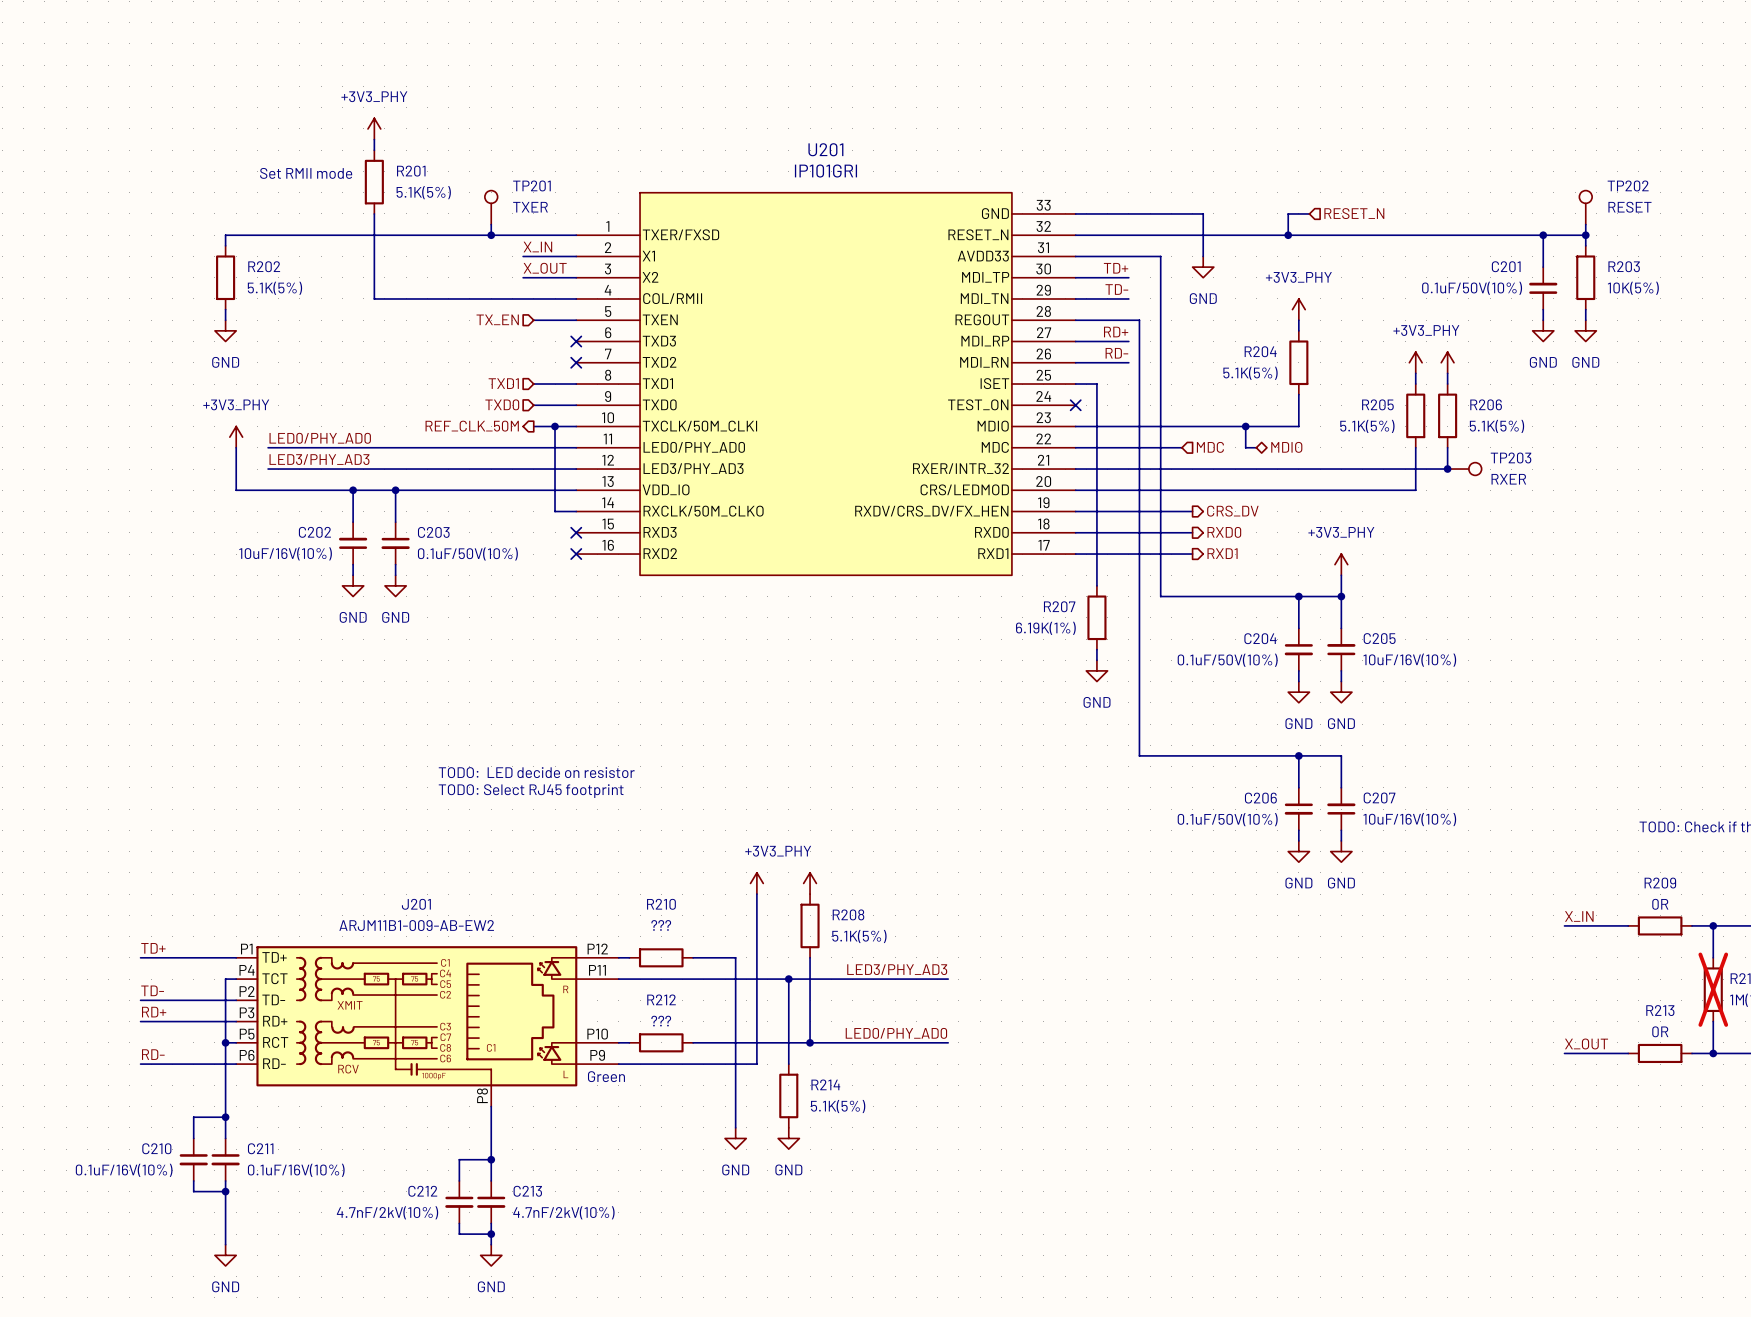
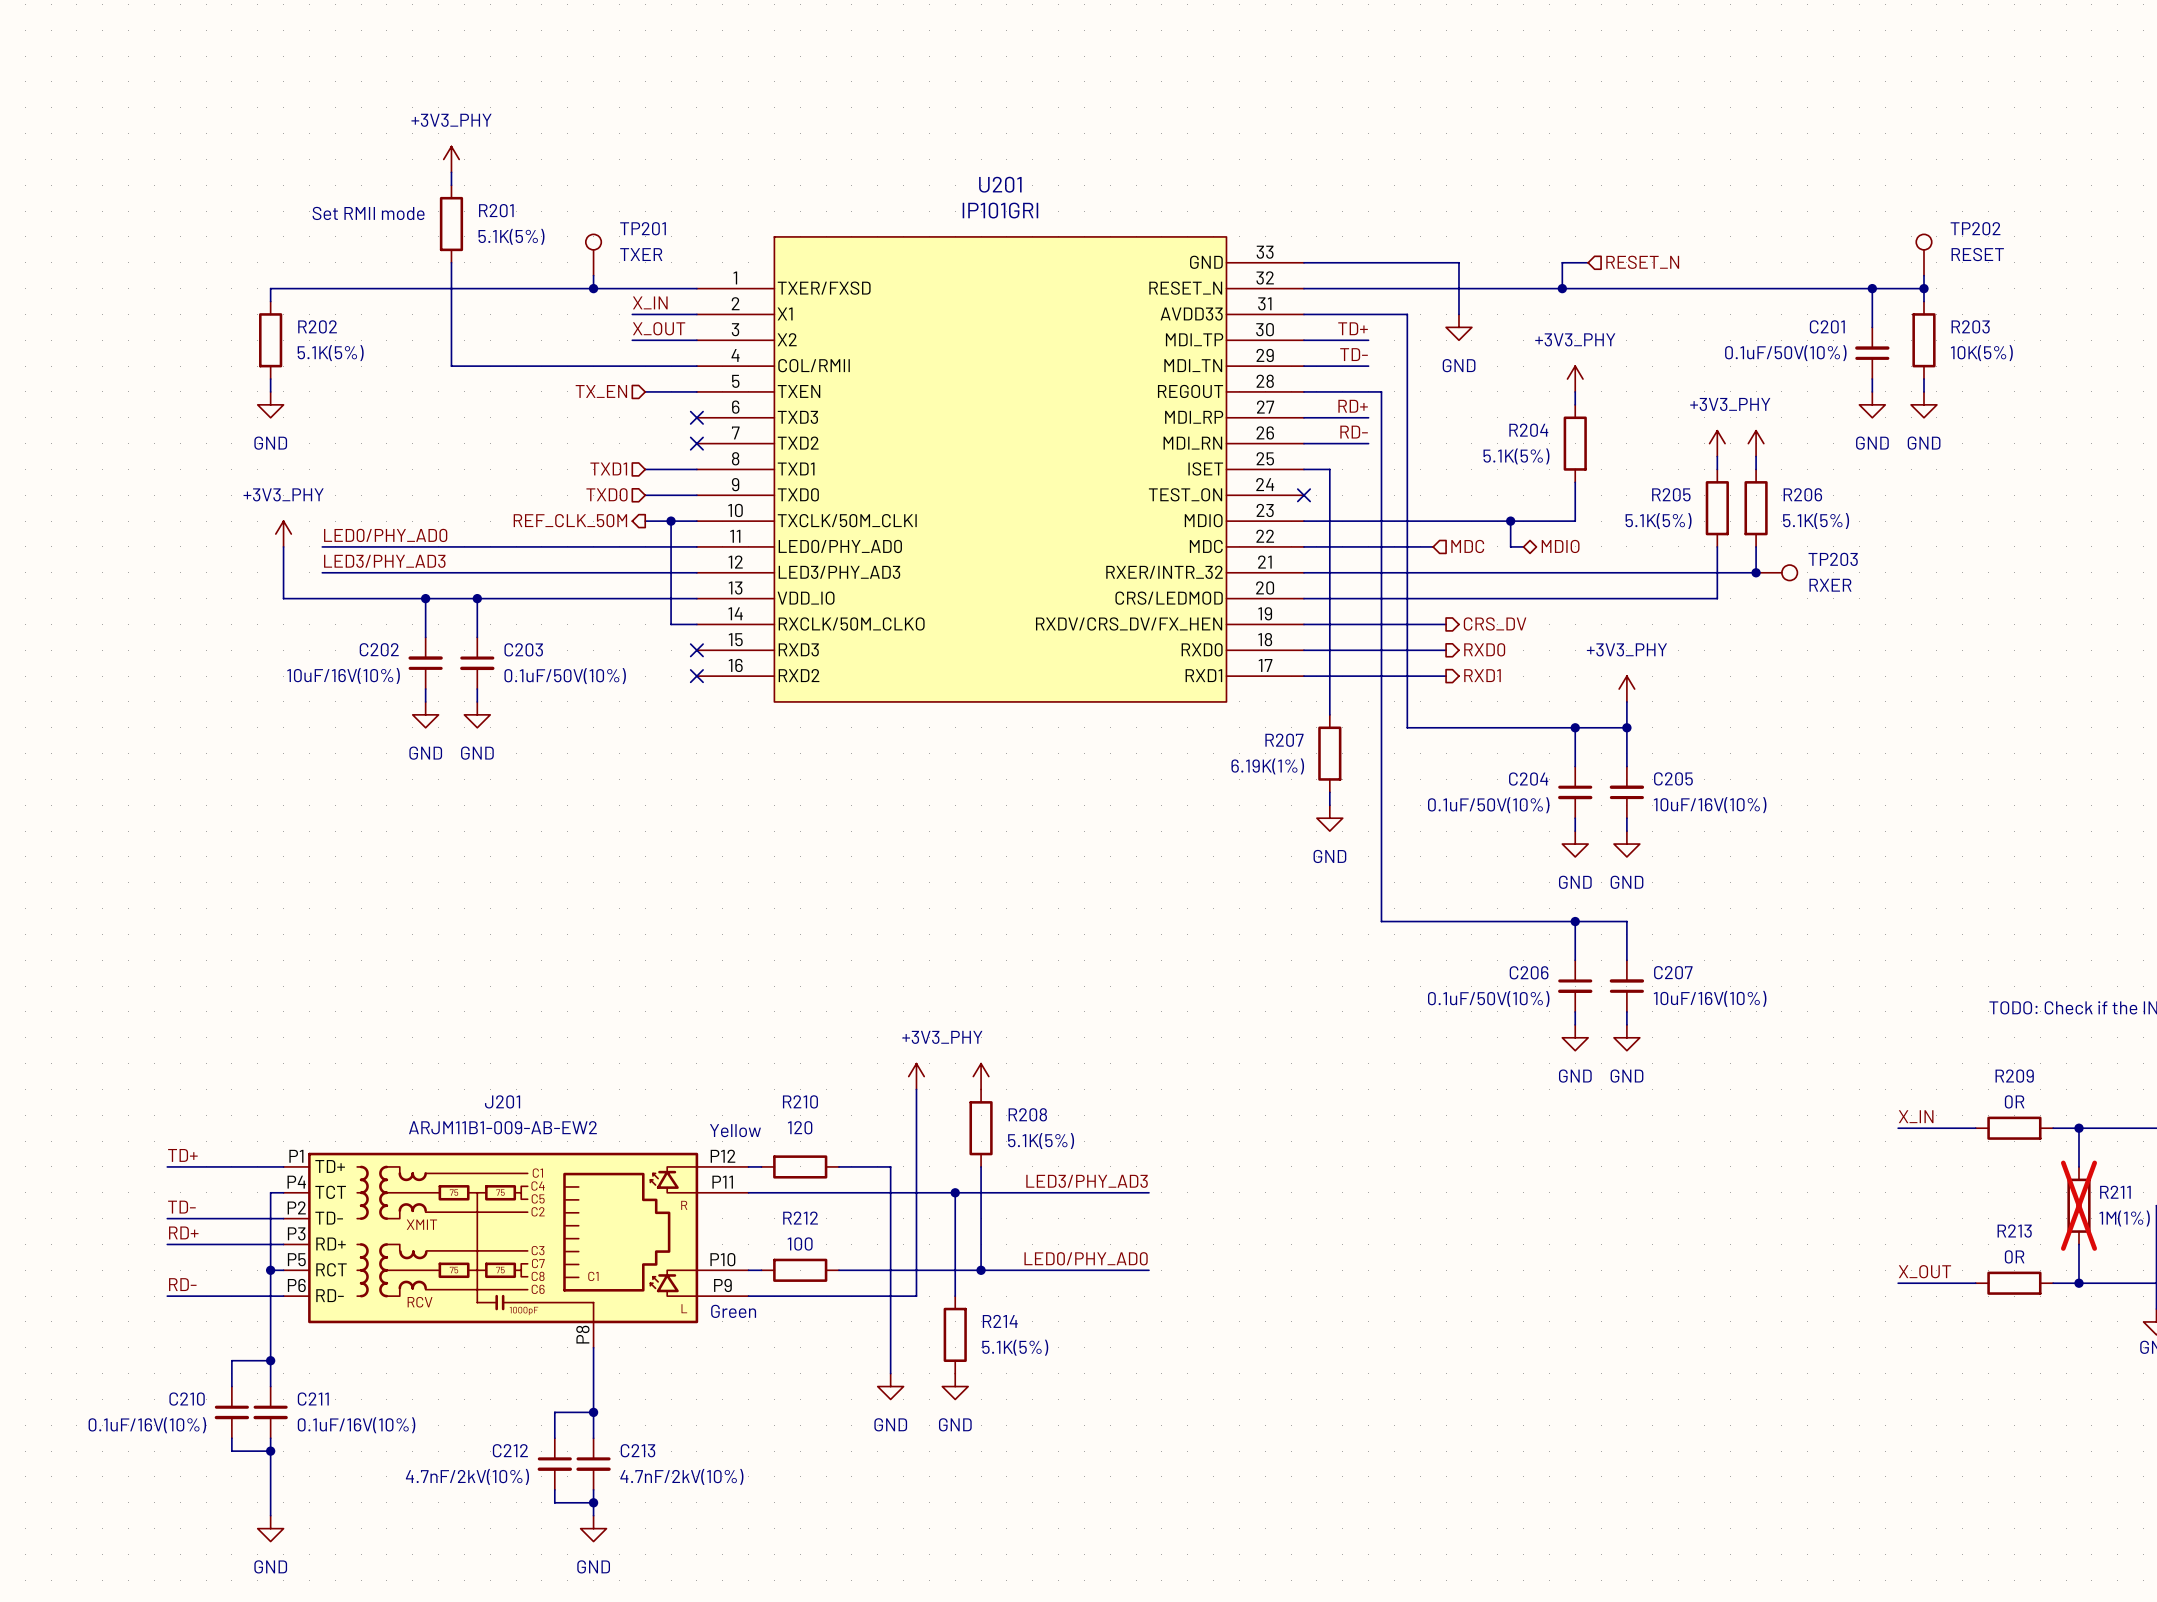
text: TODO: LED decide on resistor (536, 772) -> none
text: TODO: Select RJ45 footprint (531, 791) -> none
R210 value: ??? (661, 925) -> 120 (800, 1127)
text: none -> Yellow (735, 1130)
R212 value: ??? (661, 1021) -> 100 (800, 1243)

